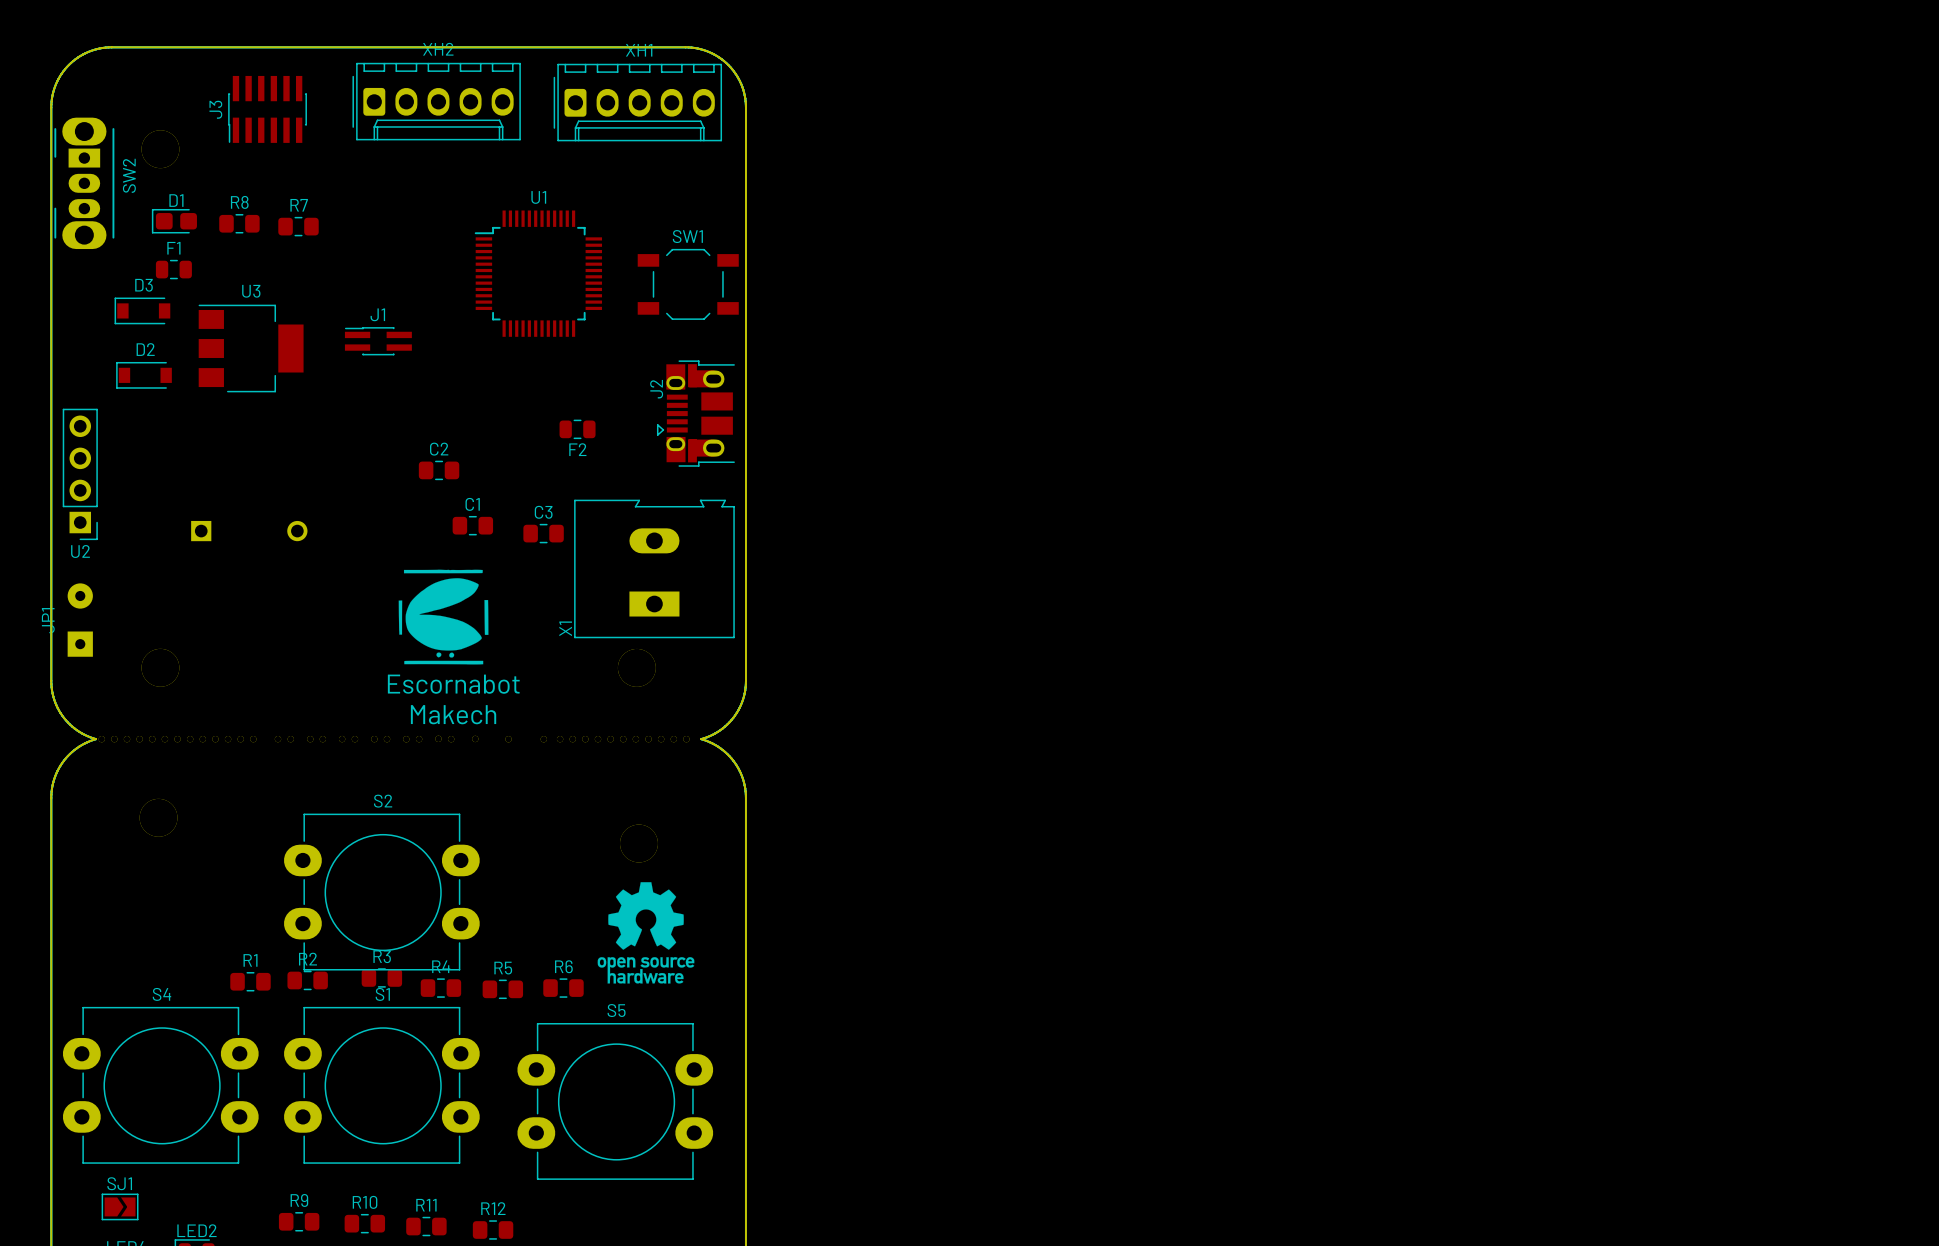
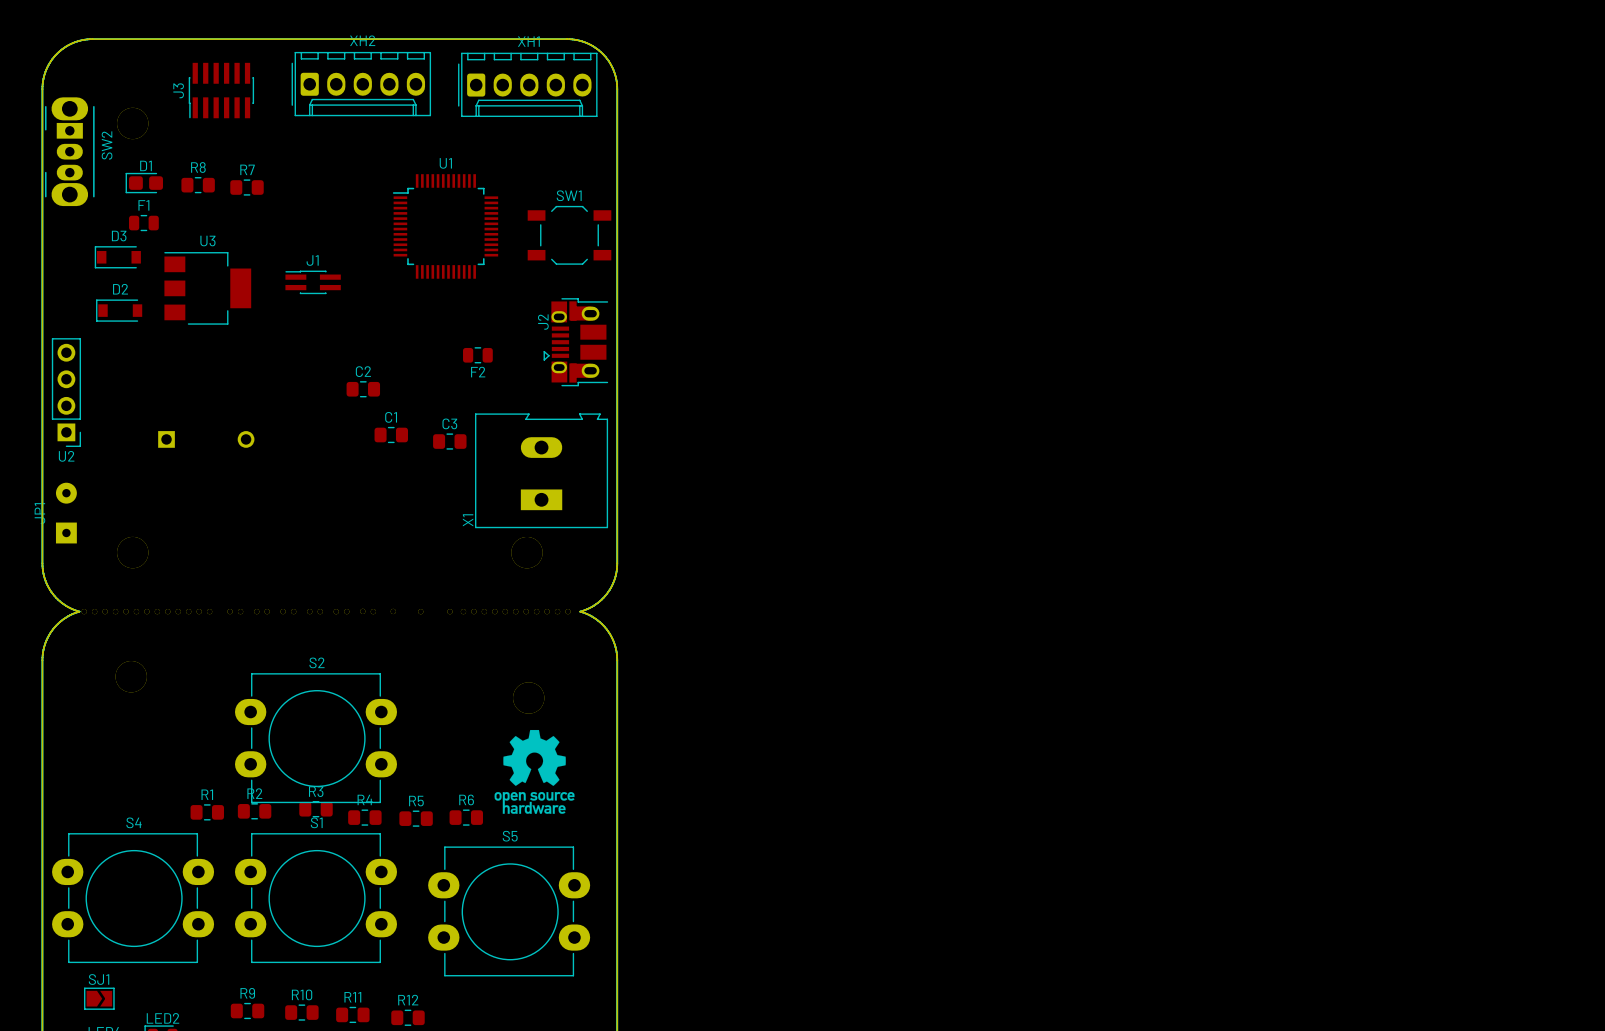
drawing: [398, 569, 489, 665] -> none
text: Escornabot (453, 684) -> none
text: Makech (453, 714) -> none

